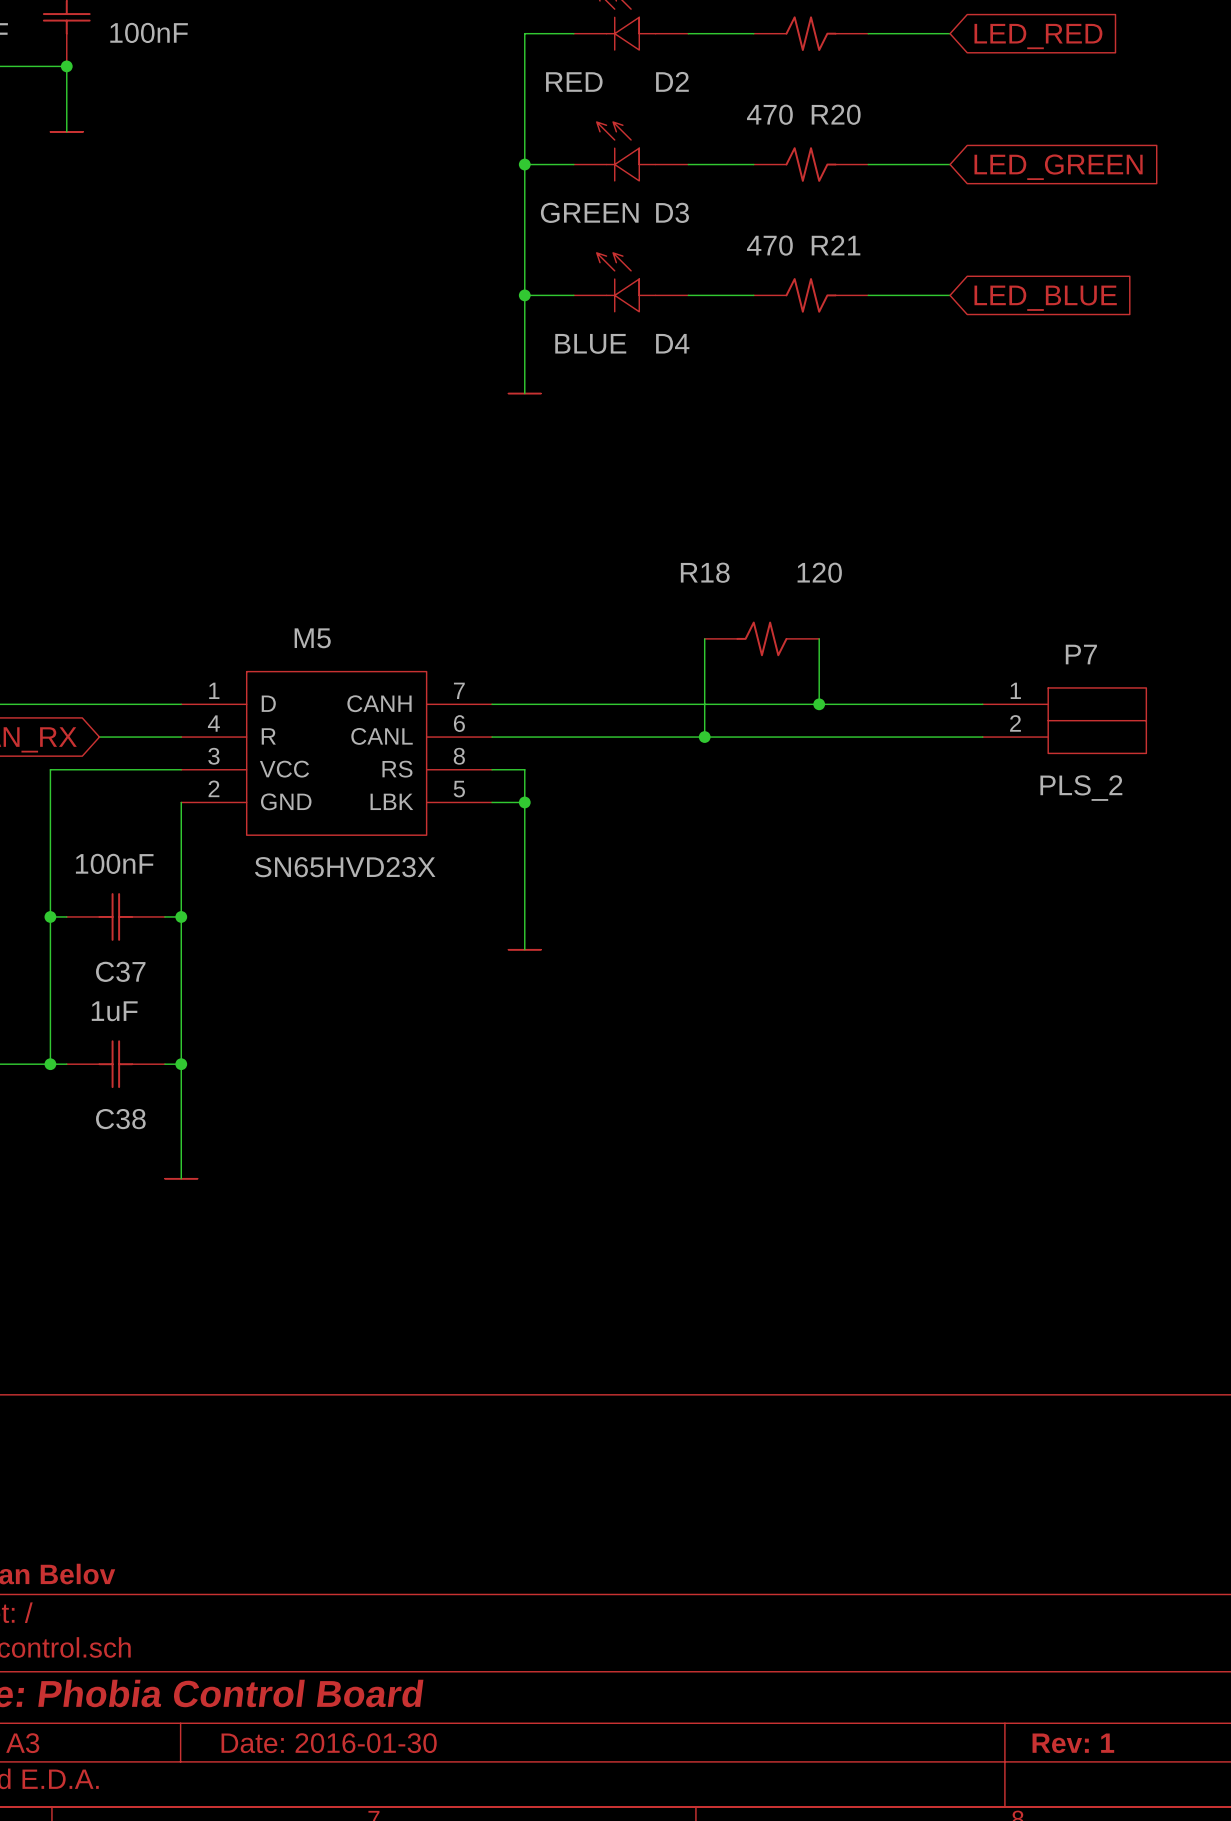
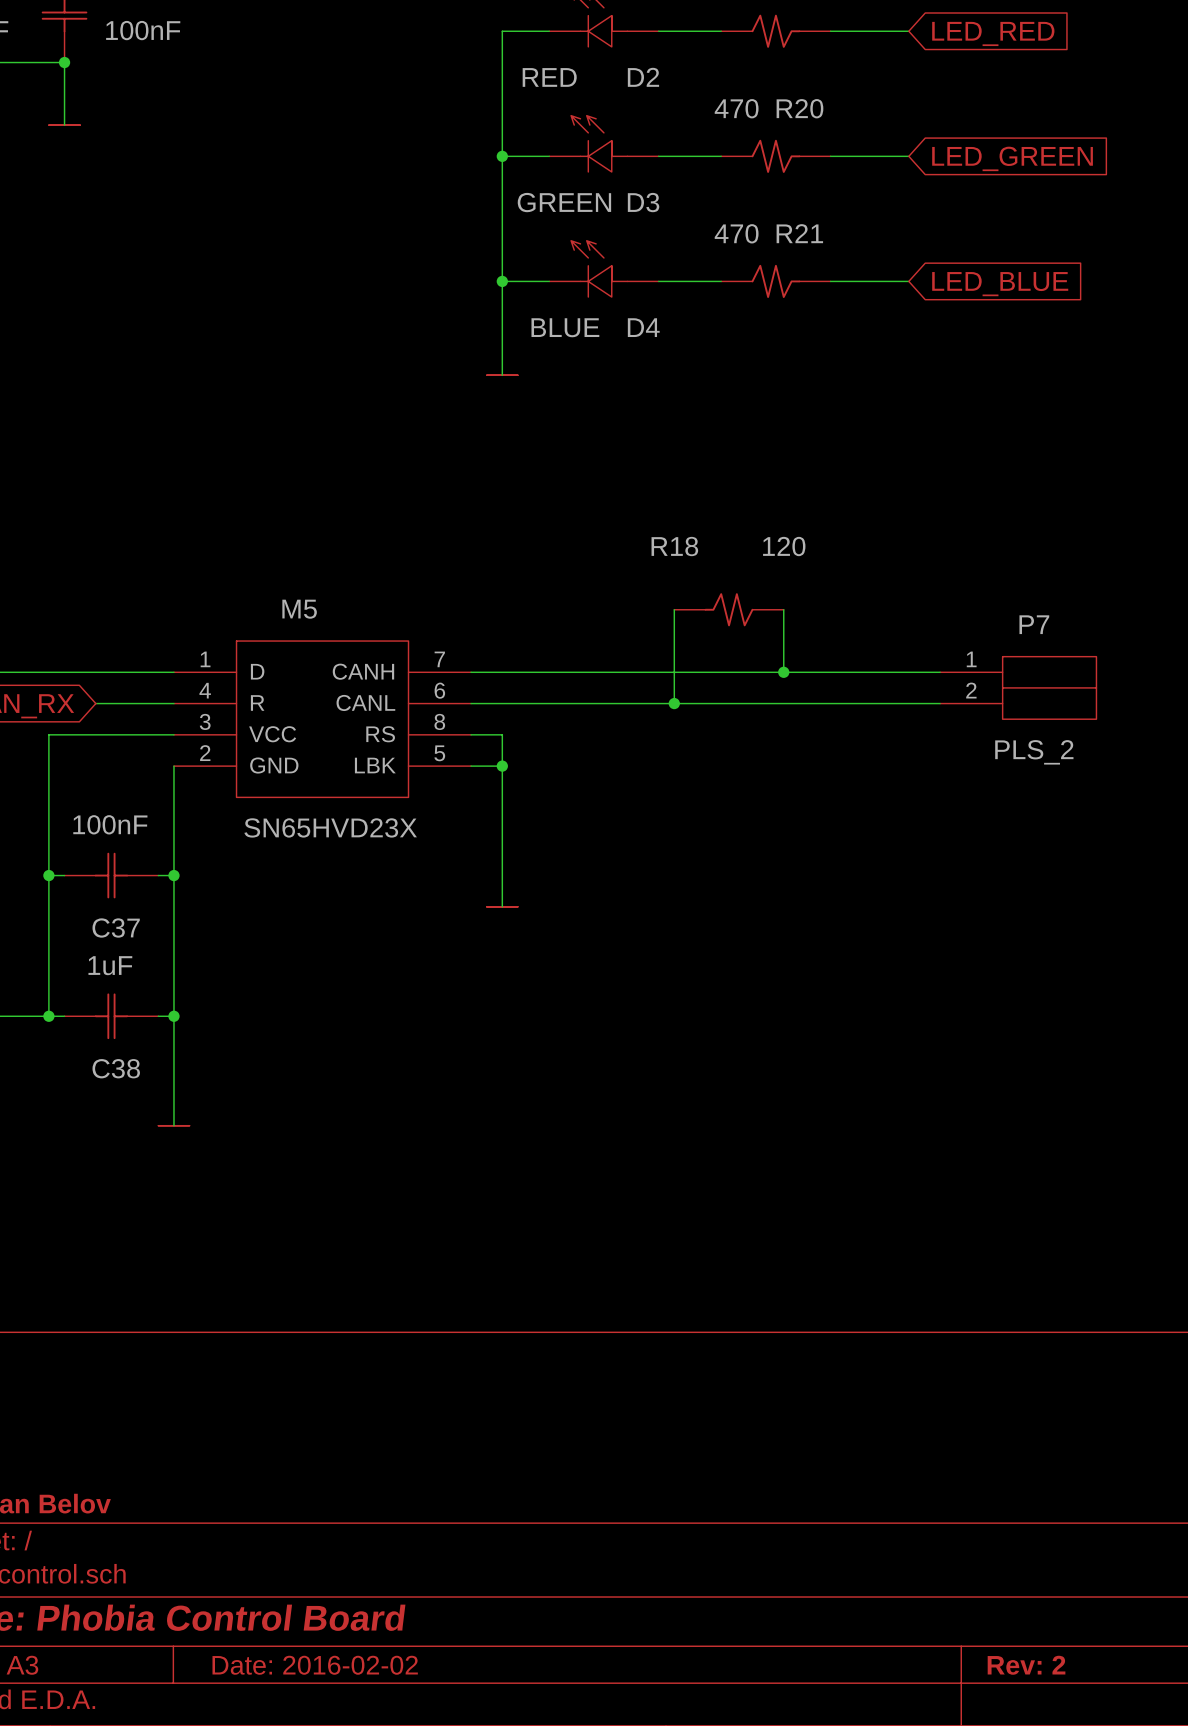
title block: Date: 2016-01-30 (329, 1743) -> Date: 2016-02-02 (315, 1665)
title block: Rev: 1 (1073, 1743) -> Rev: 2 (1026, 1665)

